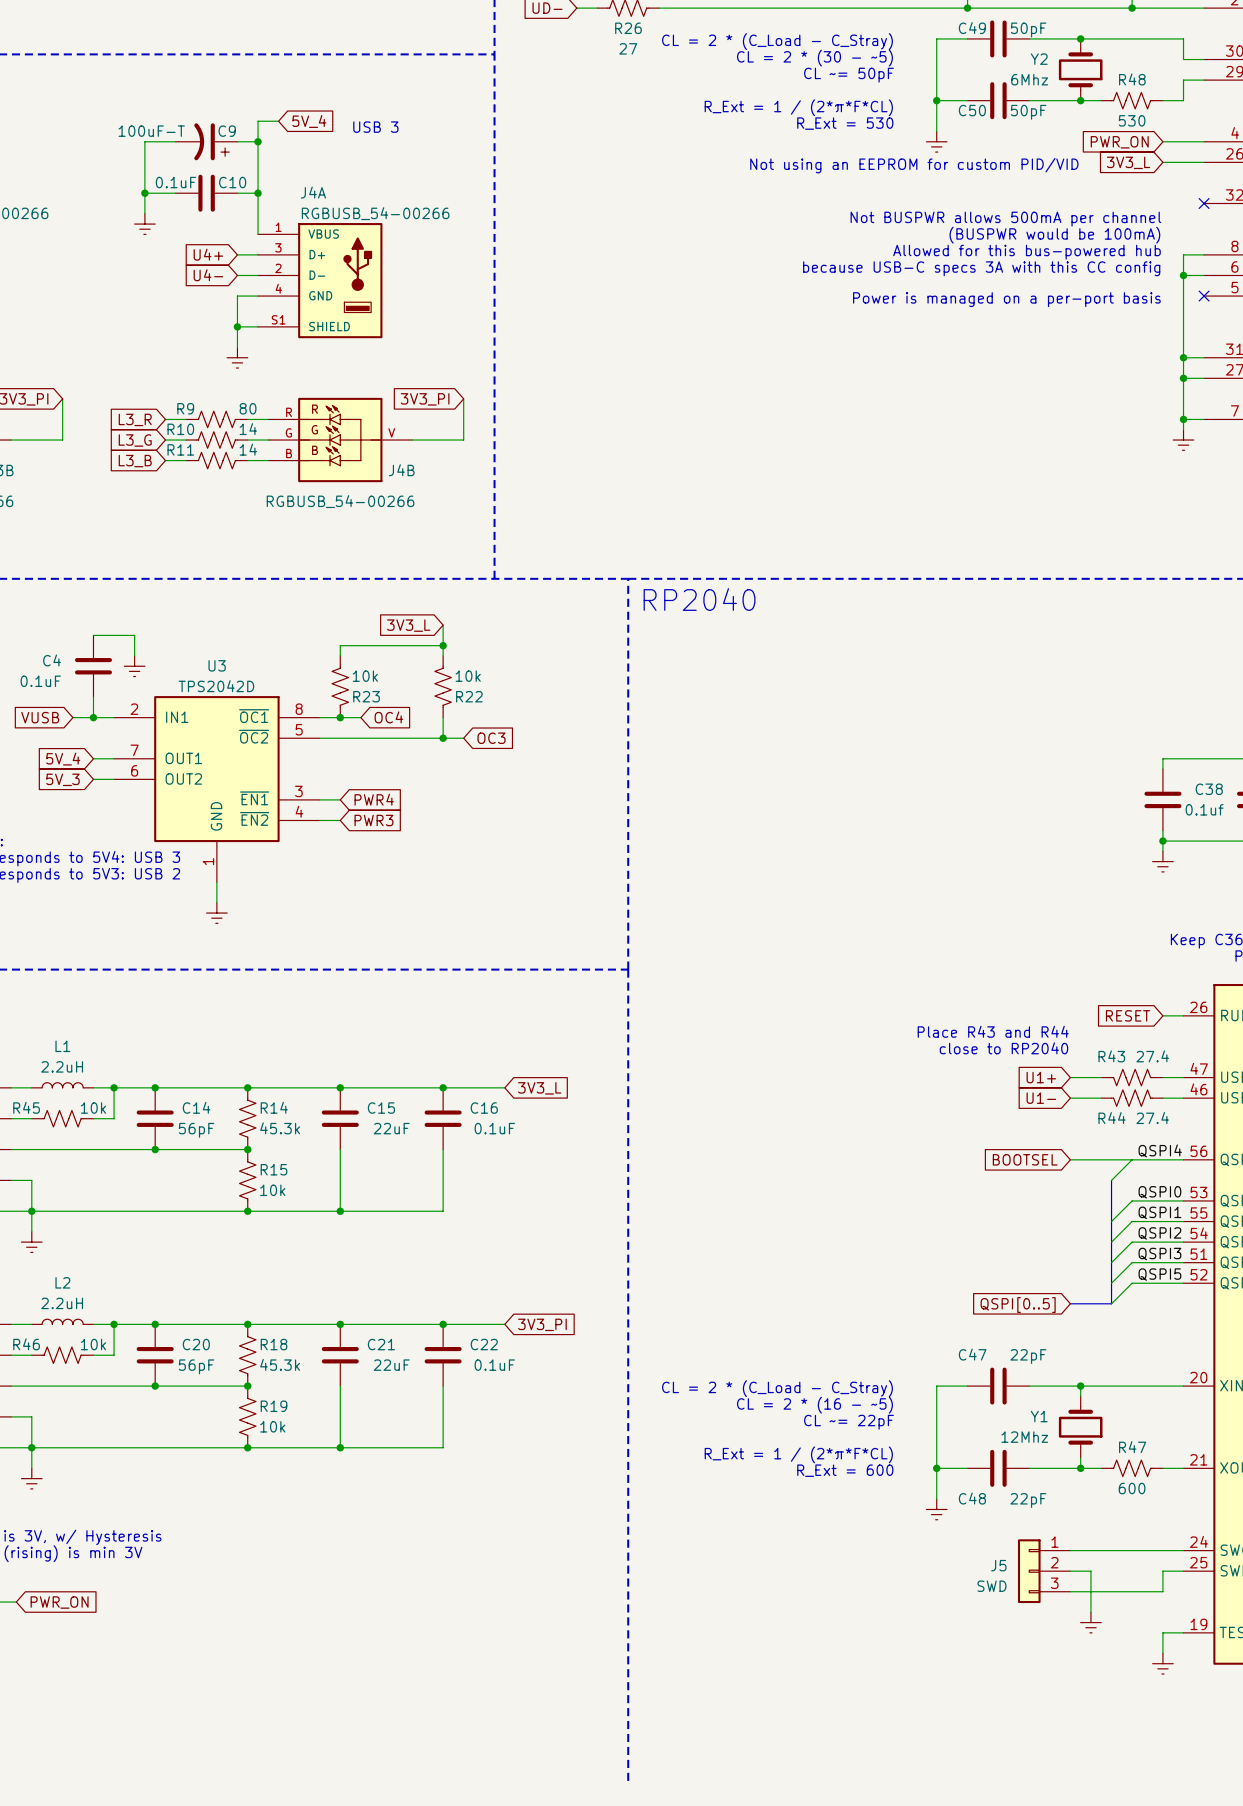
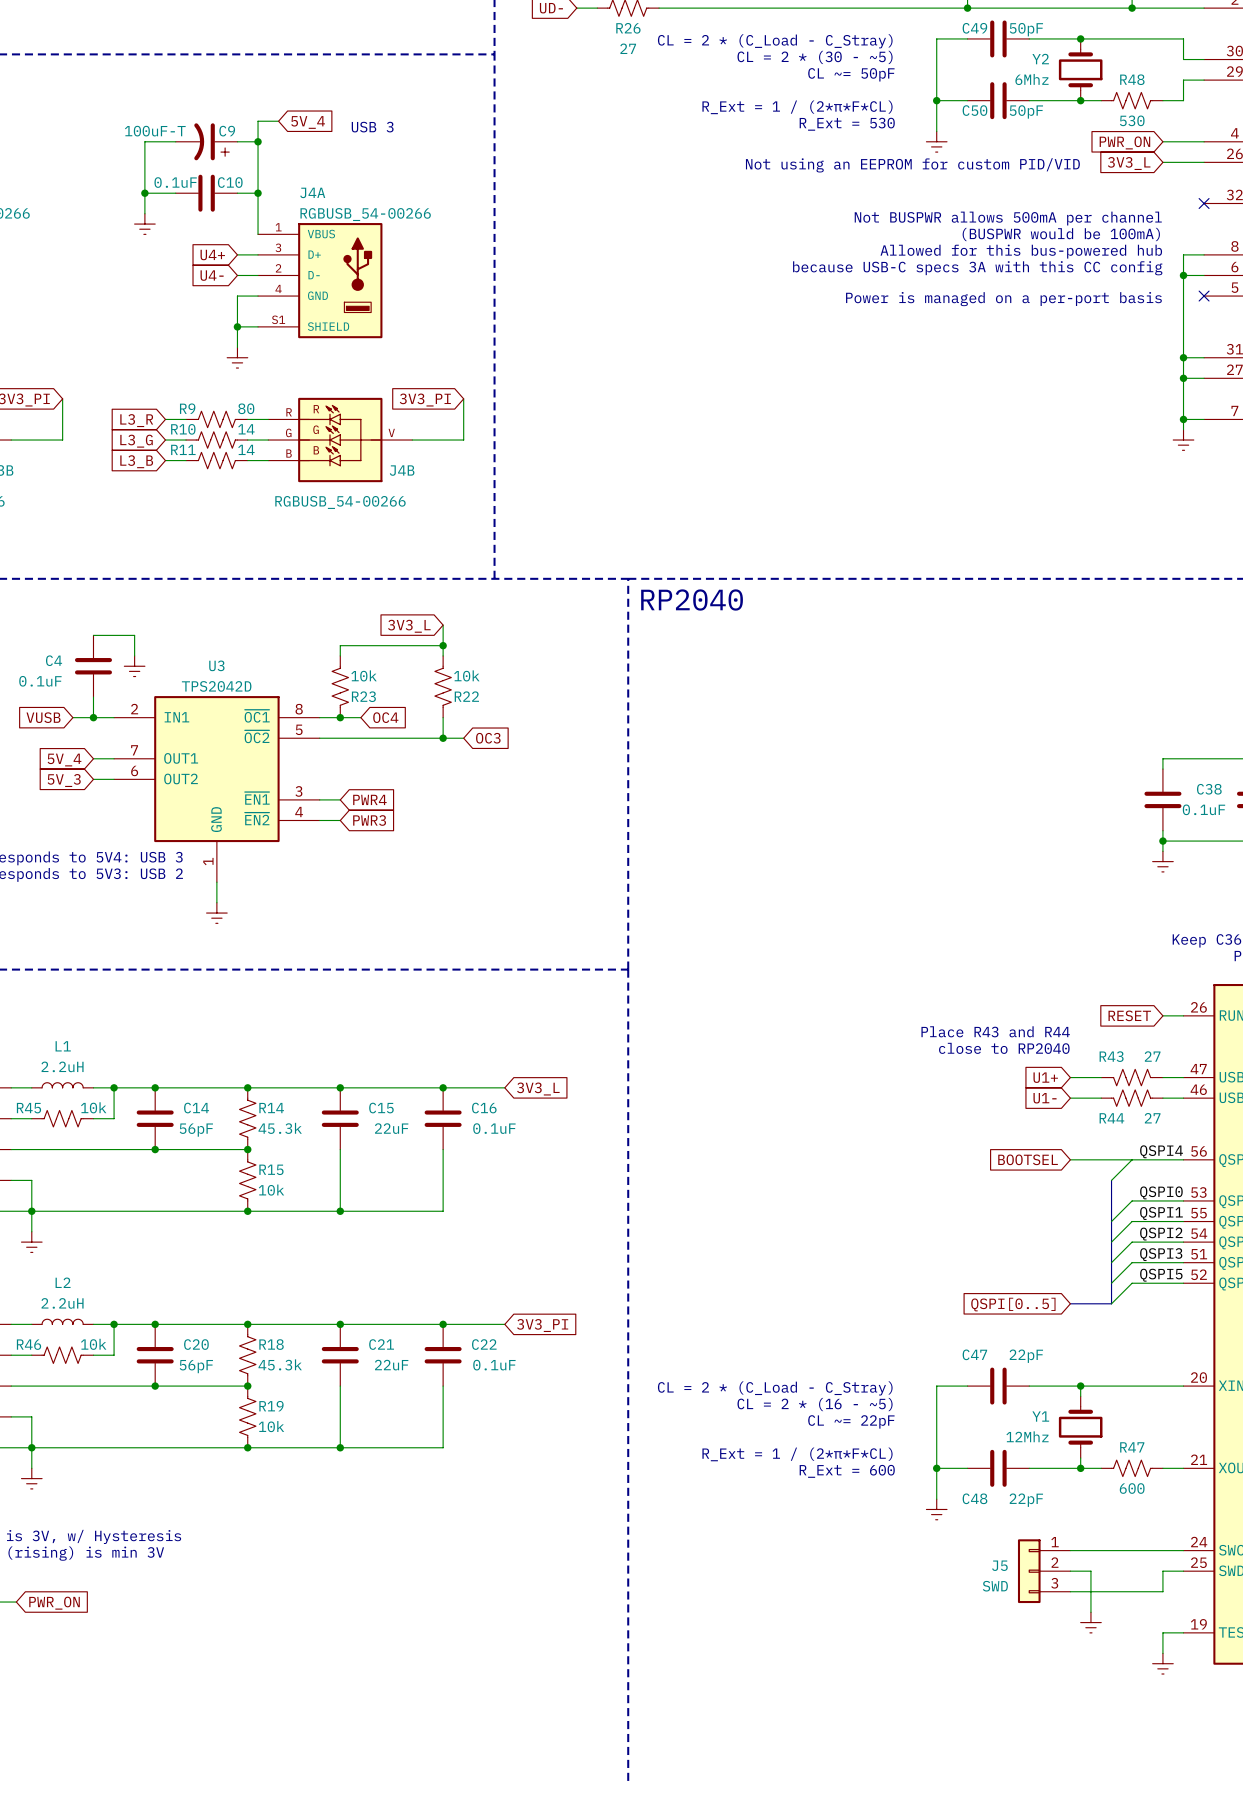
C38 value: 0.1uf (1204, 809) -> 0.1uF (1203, 809)
R43 value: 27.4 (1152, 1056) -> 27 (1152, 1056)
R44 value: 27.4 (1152, 1118) -> 27 (1152, 1118)

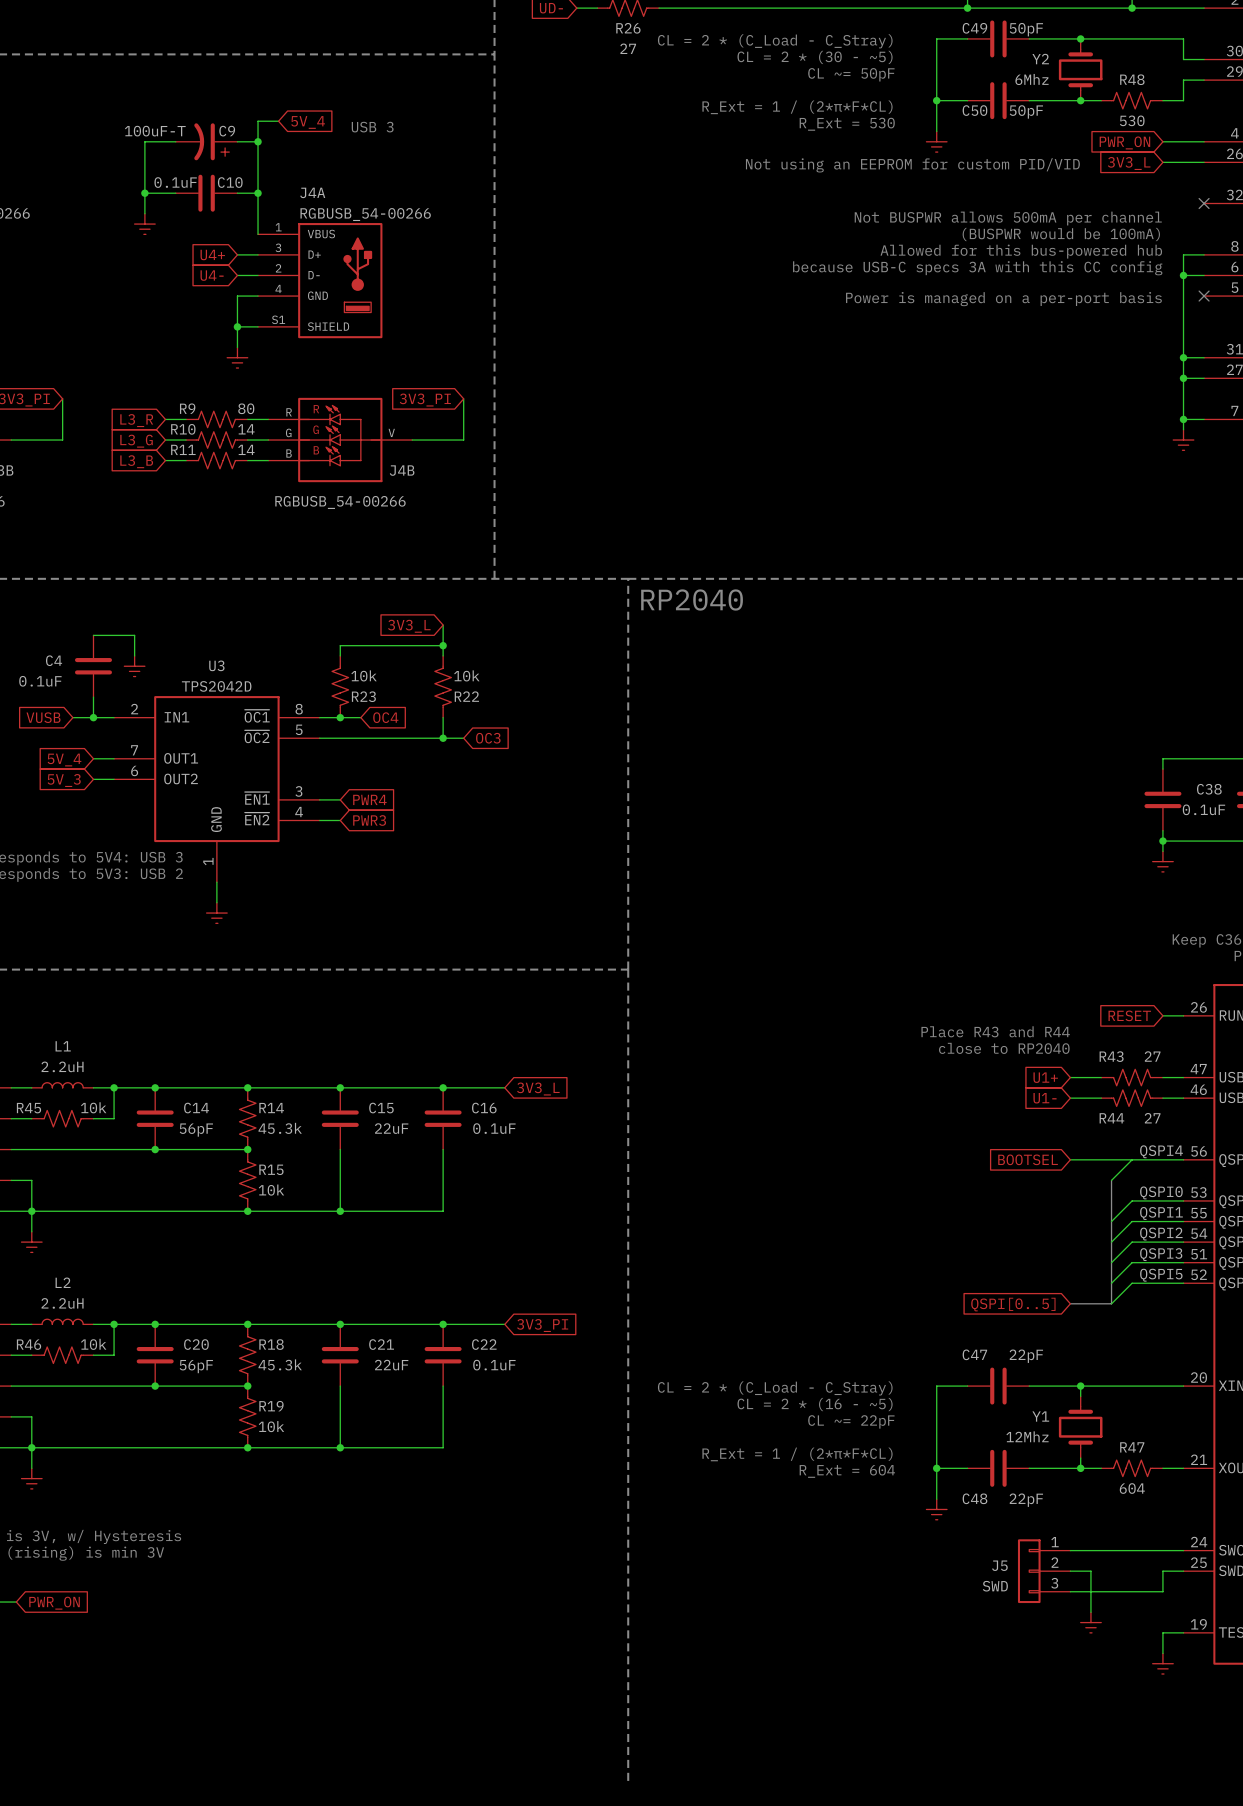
text: R_Ext = 600 (847, 1471) -> R_Ext = 604 (847, 1471)
R47 value: 600 (1132, 1488) -> 604 (1132, 1488)

